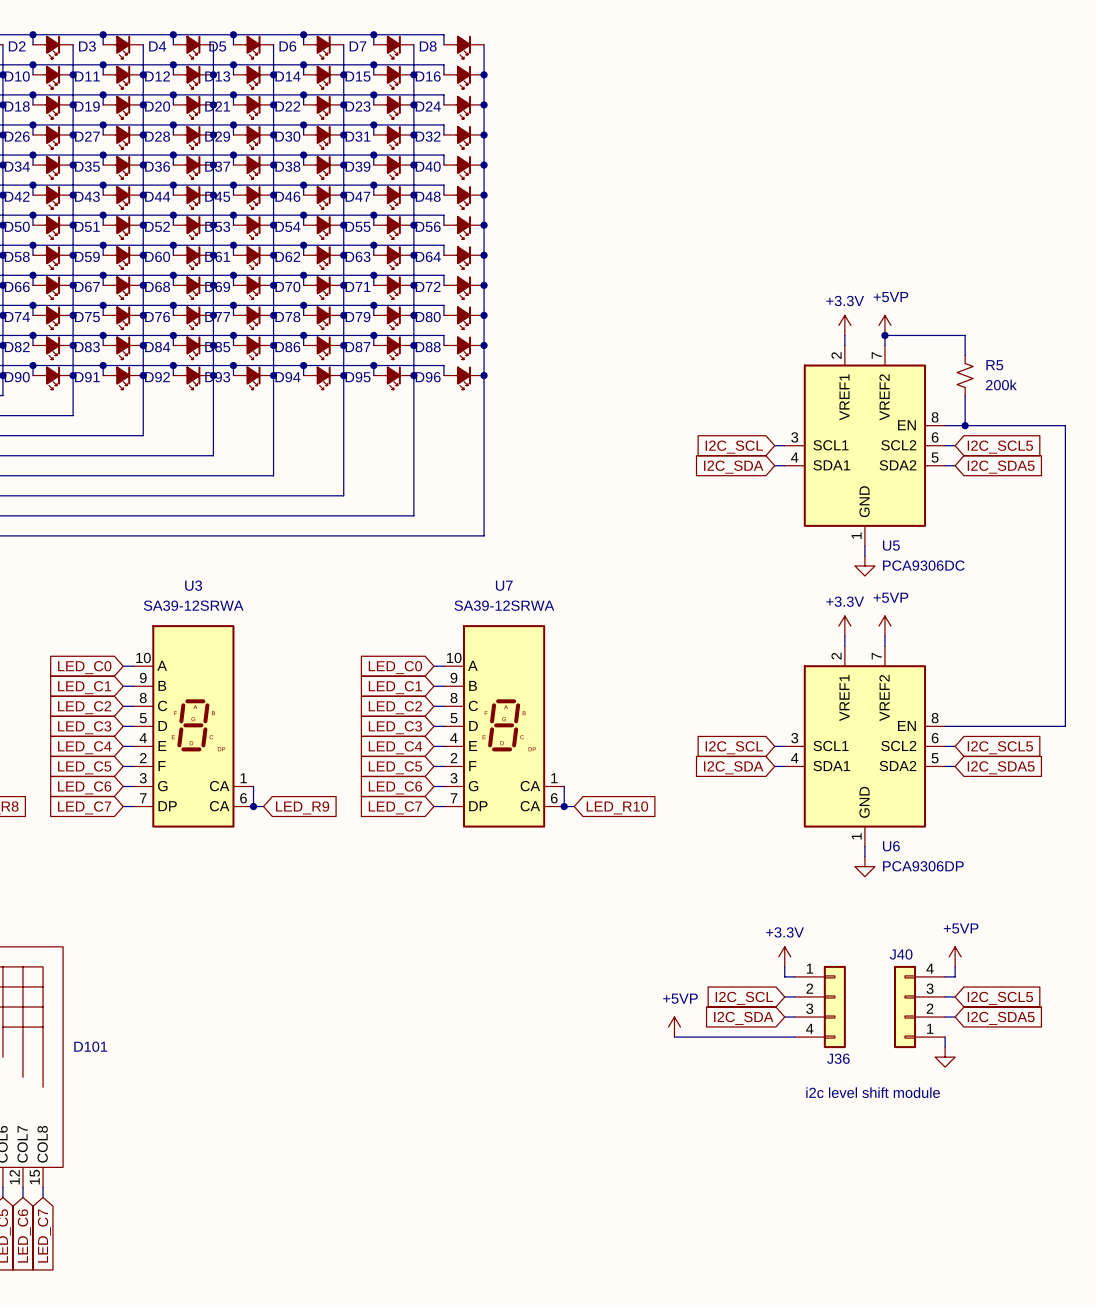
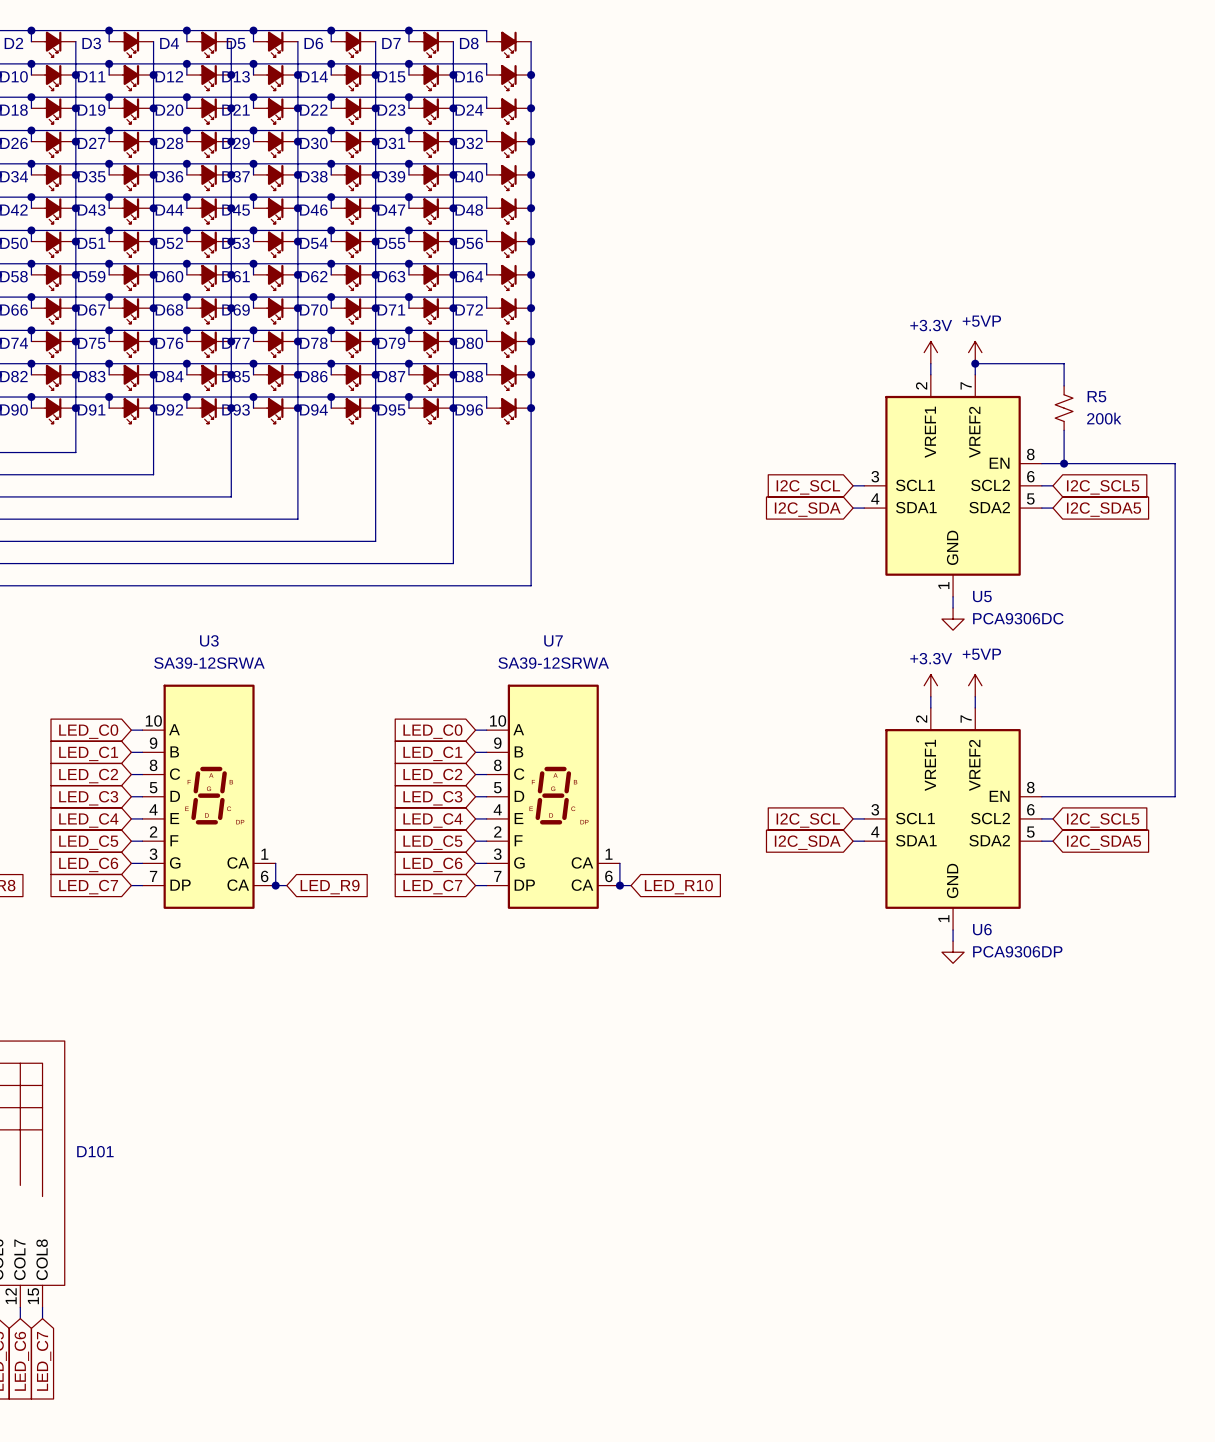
power symbol: +3.3V (784, 956) -> none
power symbol: +5VP (955, 956) -> none
wire: (784, 966) (784, 976) (794, 976) -> none
wire: (955, 966) (955, 976) (945, 976) -> none
wire: (784, 996) (794, 996) -> none
wire: (945, 996) (955, 996) -> none
global label: I2C_SCL (744, 998) -> none
global label: I2C_SCL5 (1000, 998) -> none
J36: (820, 1007) -> none
J40: (919, 1007) -> none
wire: (784, 1017) (794, 1017) -> none
wire: (945, 1017) (955, 1017) -> none
global label: I2C_SDA (743, 1018) -> none
global label: I2C_SDA5 (1001, 1018) -> none
power symbol: +5VP (674, 1027) -> none
wire: (674, 1037) (794, 1037) -> none
wire: (945, 1037) (945, 1047) -> none
power symbol: (945, 1057) -> none
text: i2c level shift module (873, 1092) -> none

